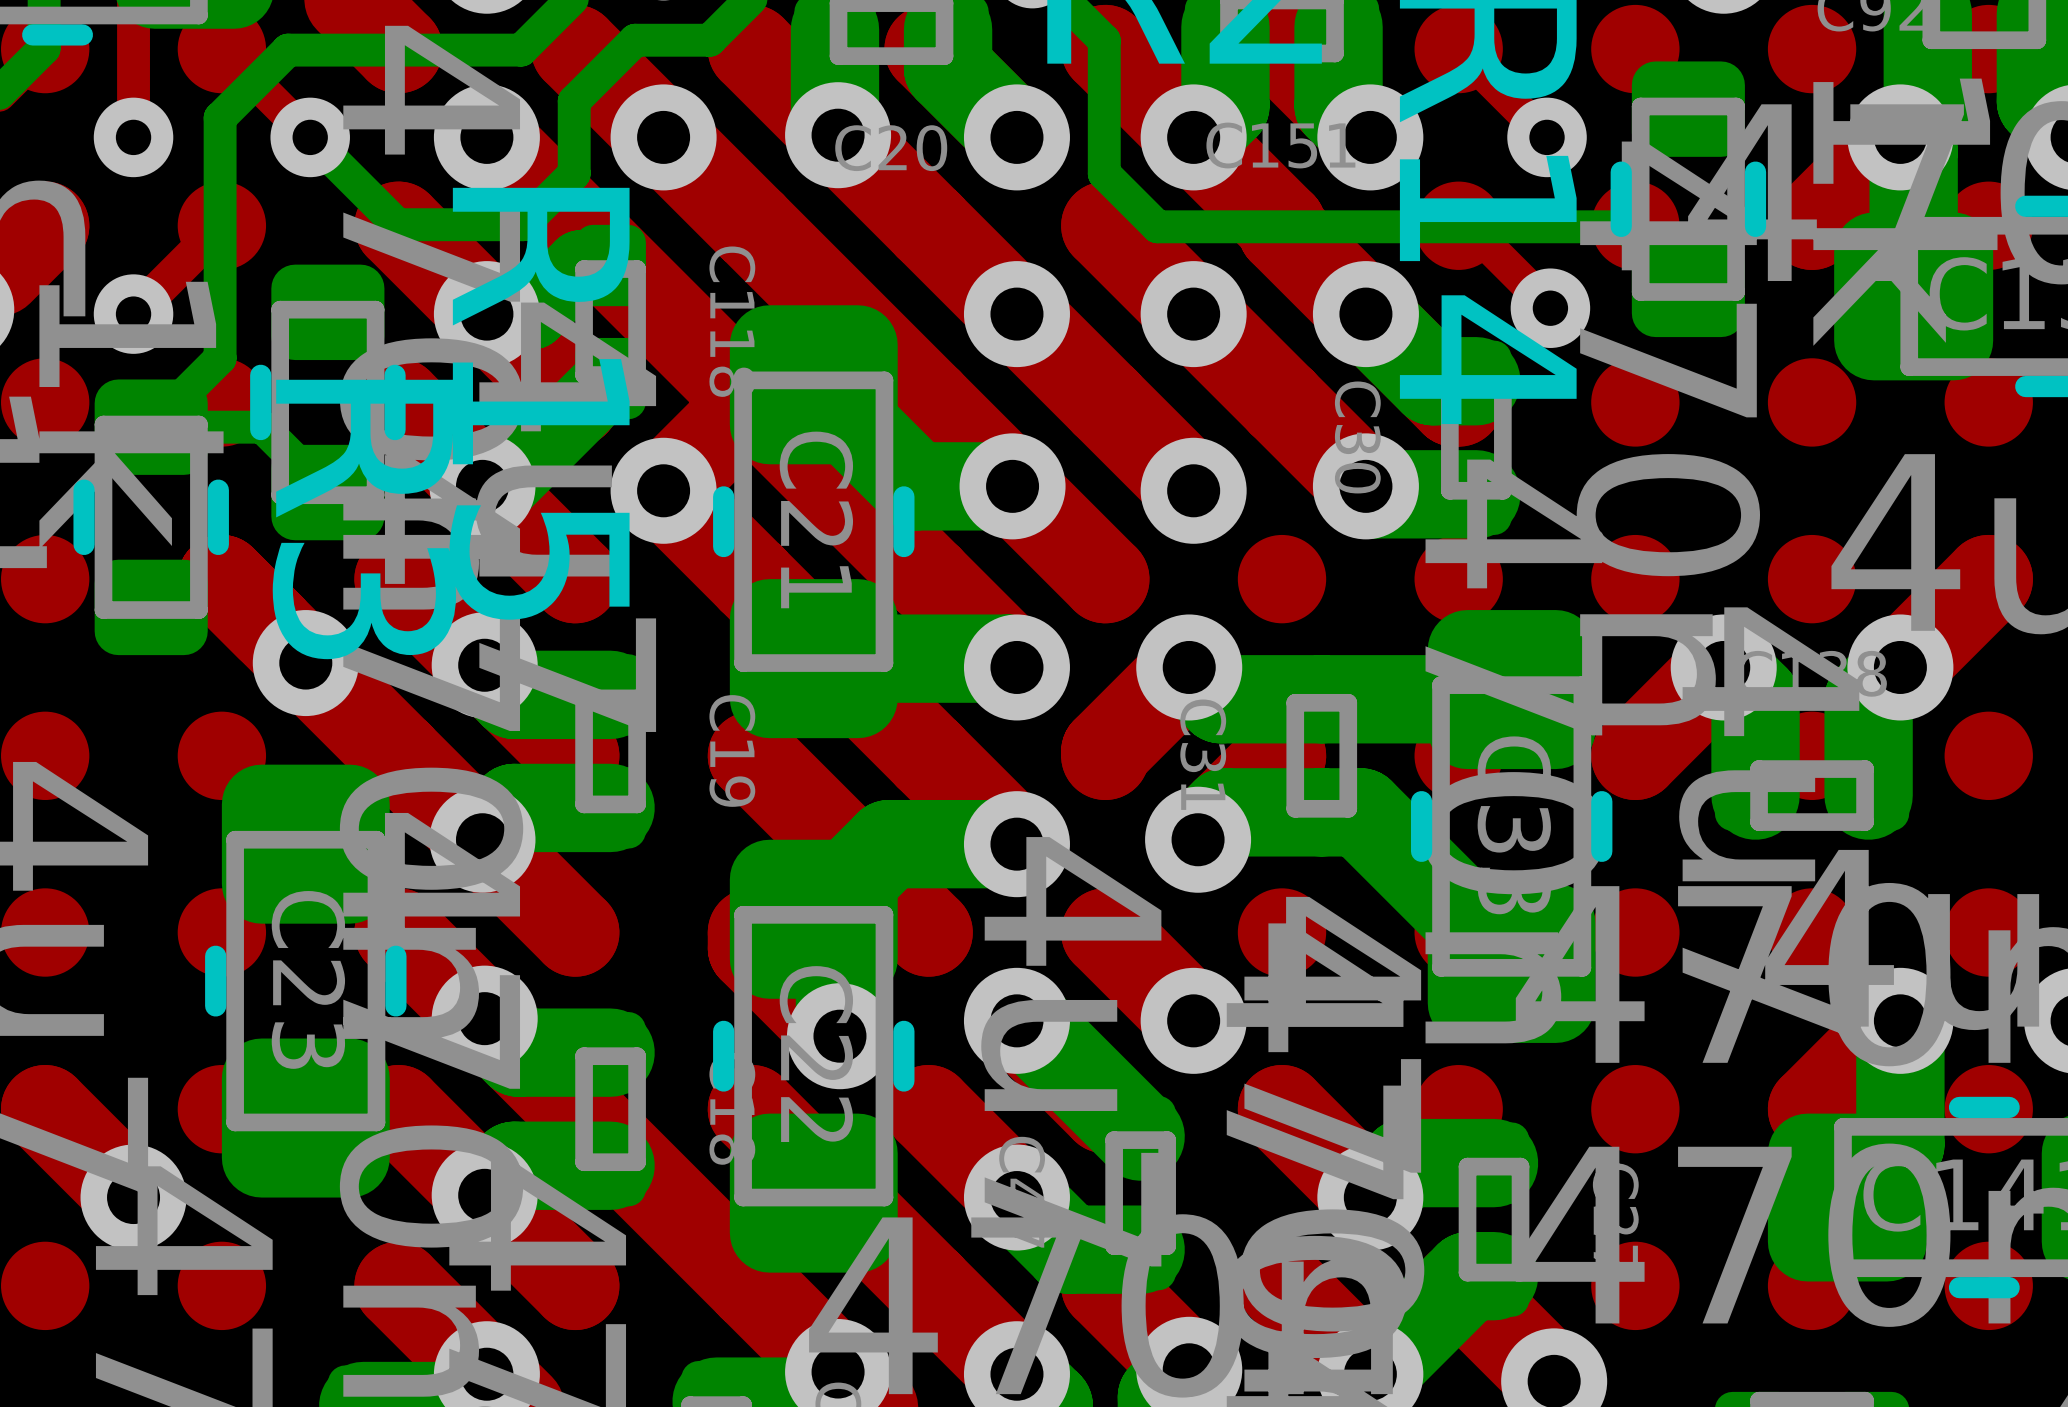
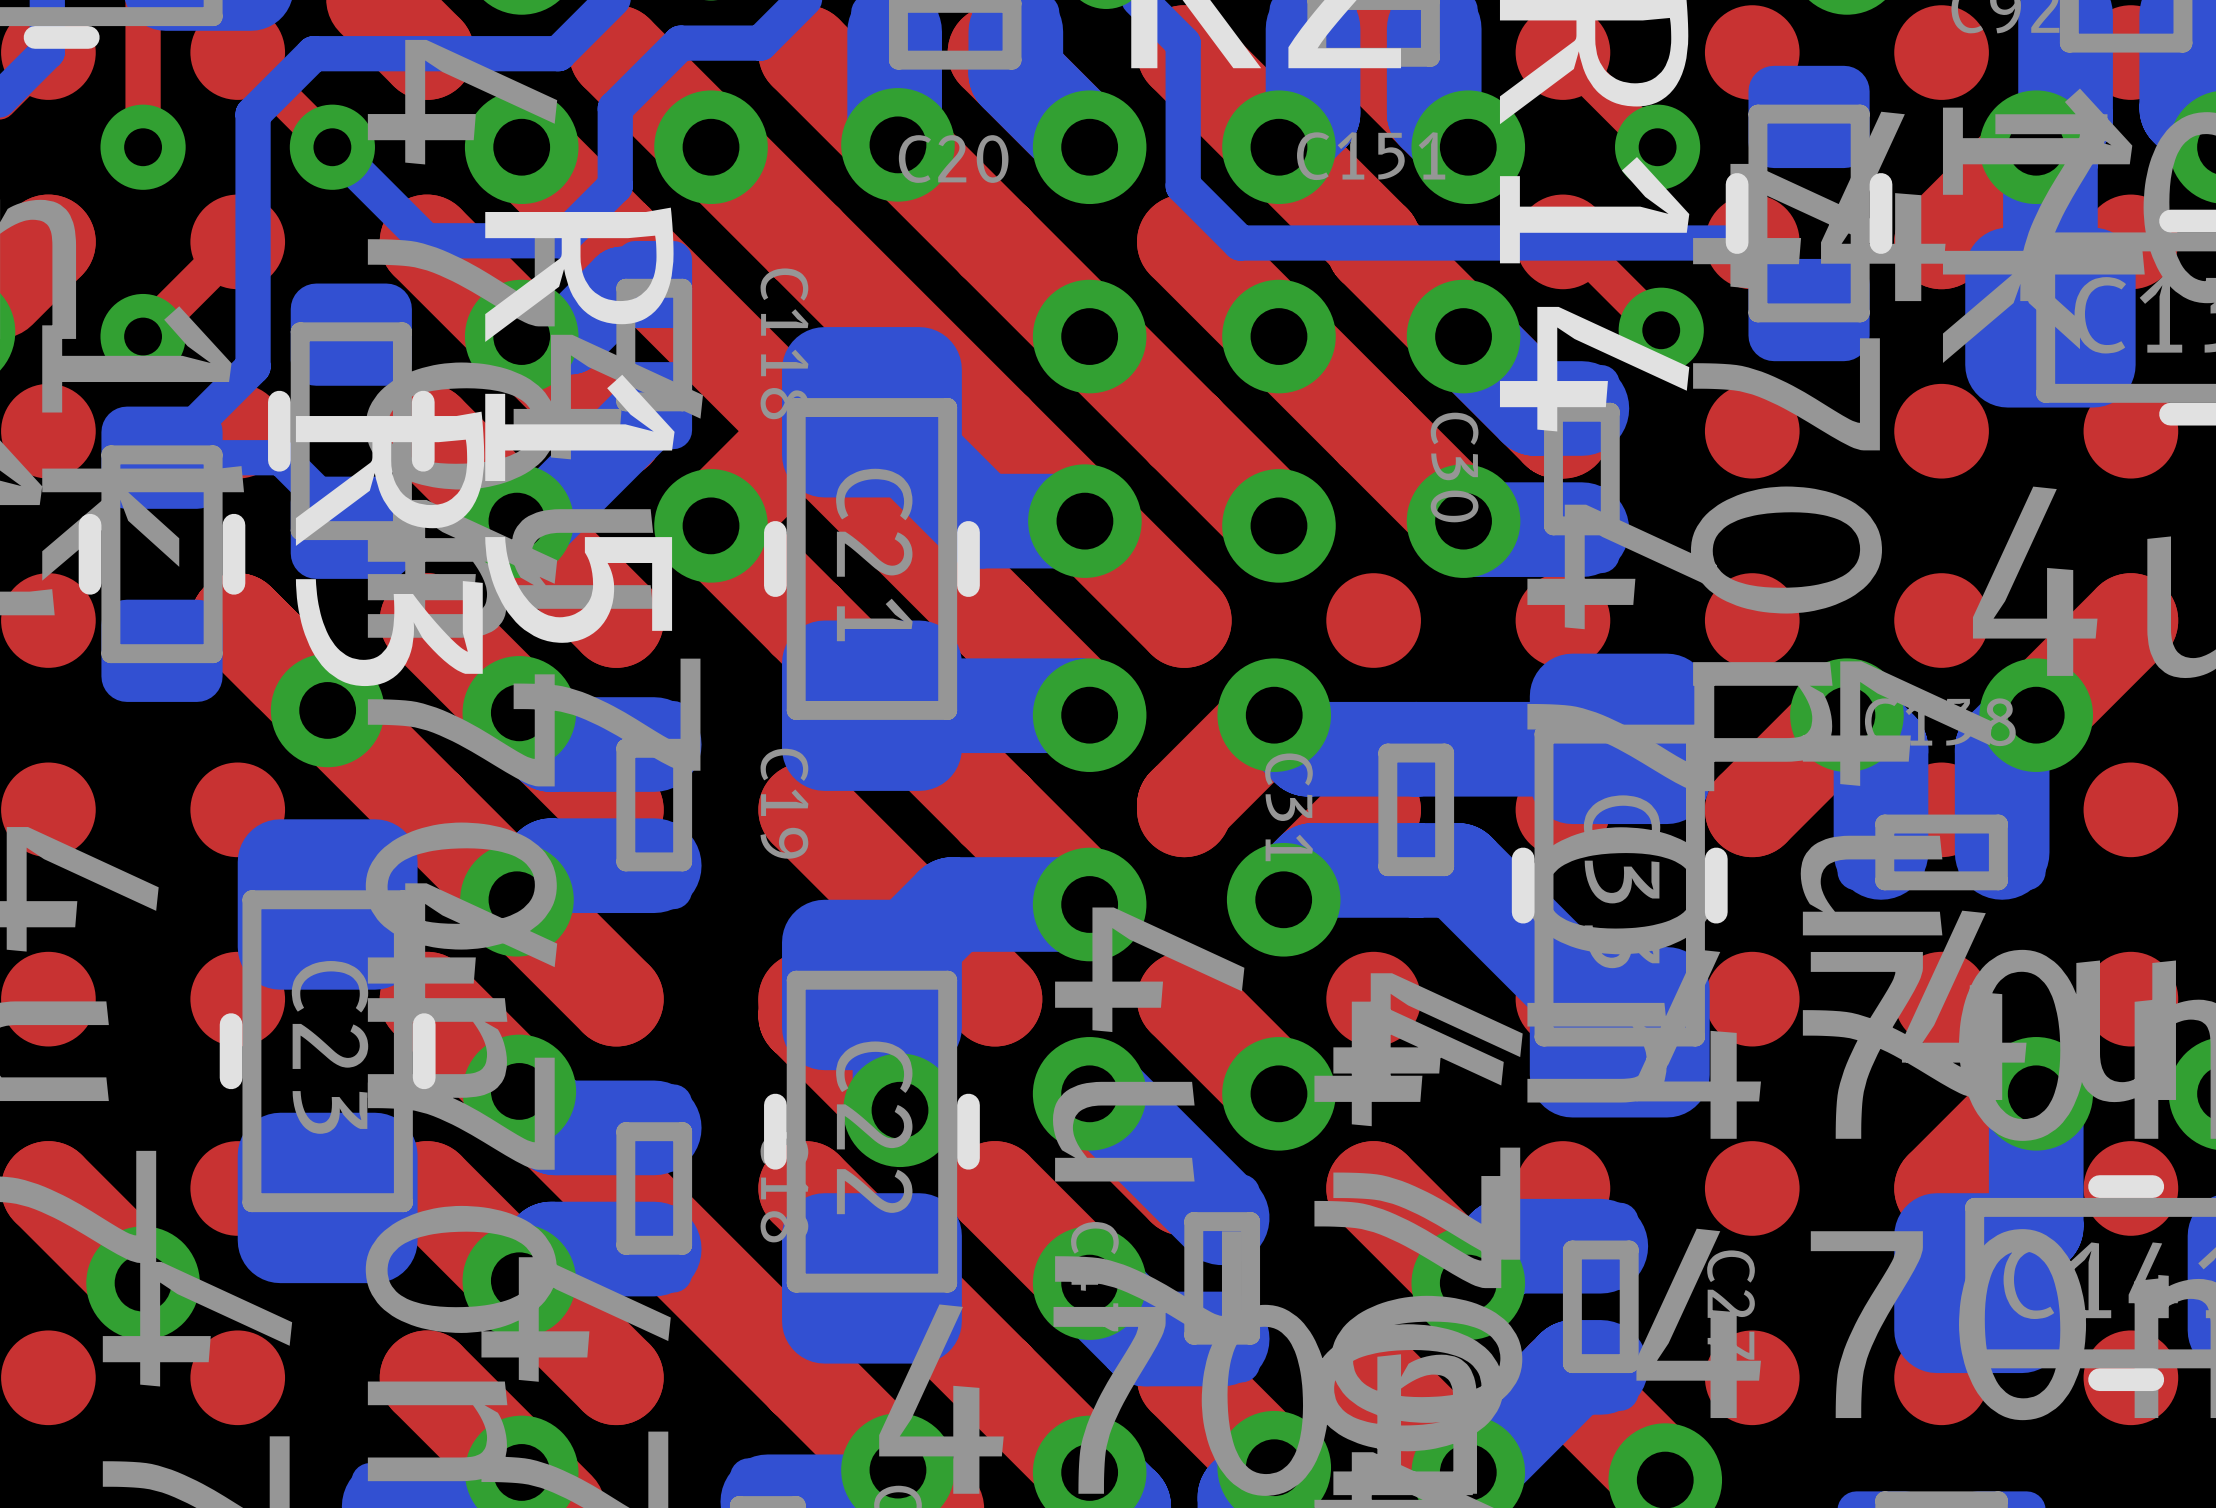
bottom track: (292, 50) (287, 50) (220, 117) (220, 358) -> (313, 53) (253, 114) (253, 366) (235, 383)

